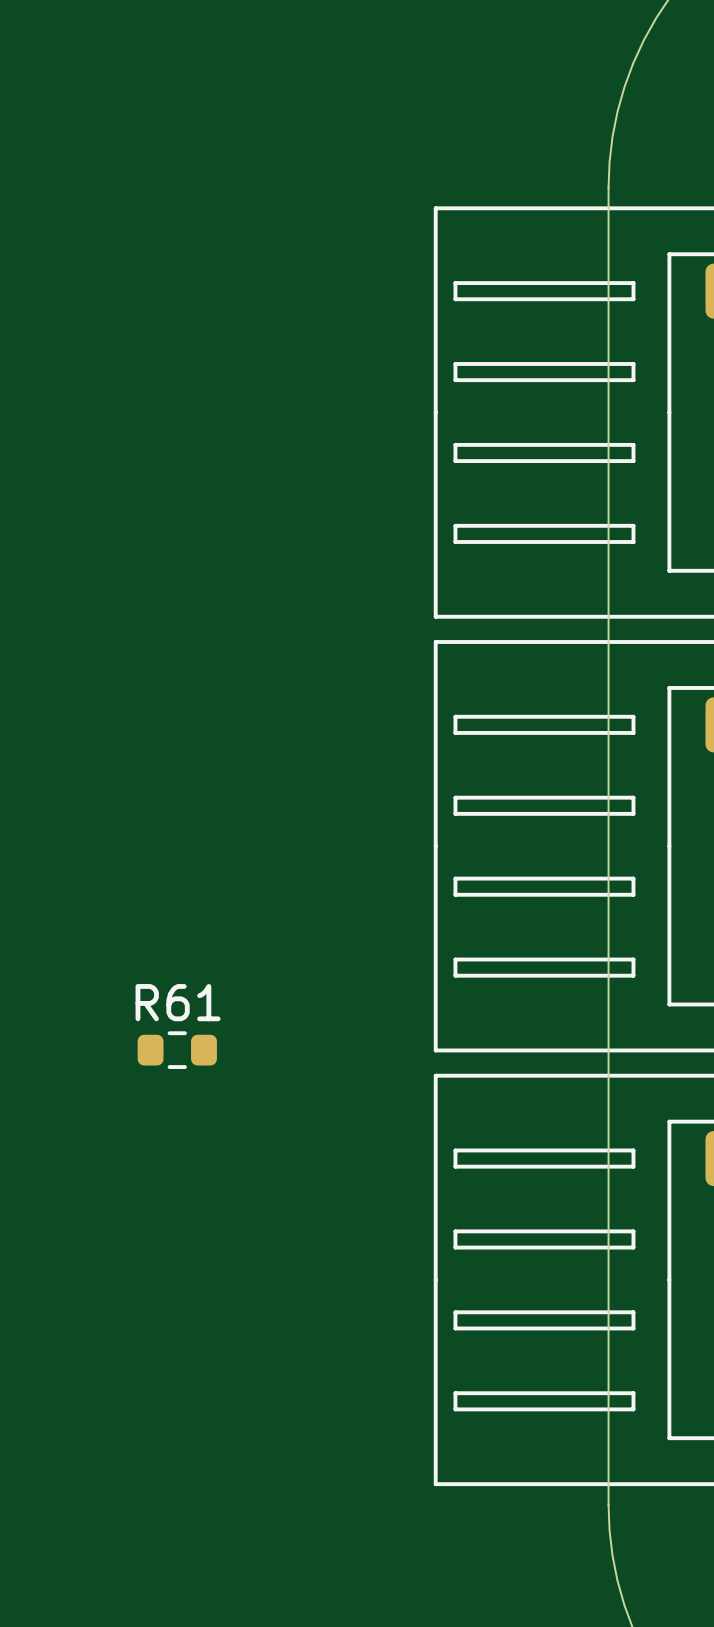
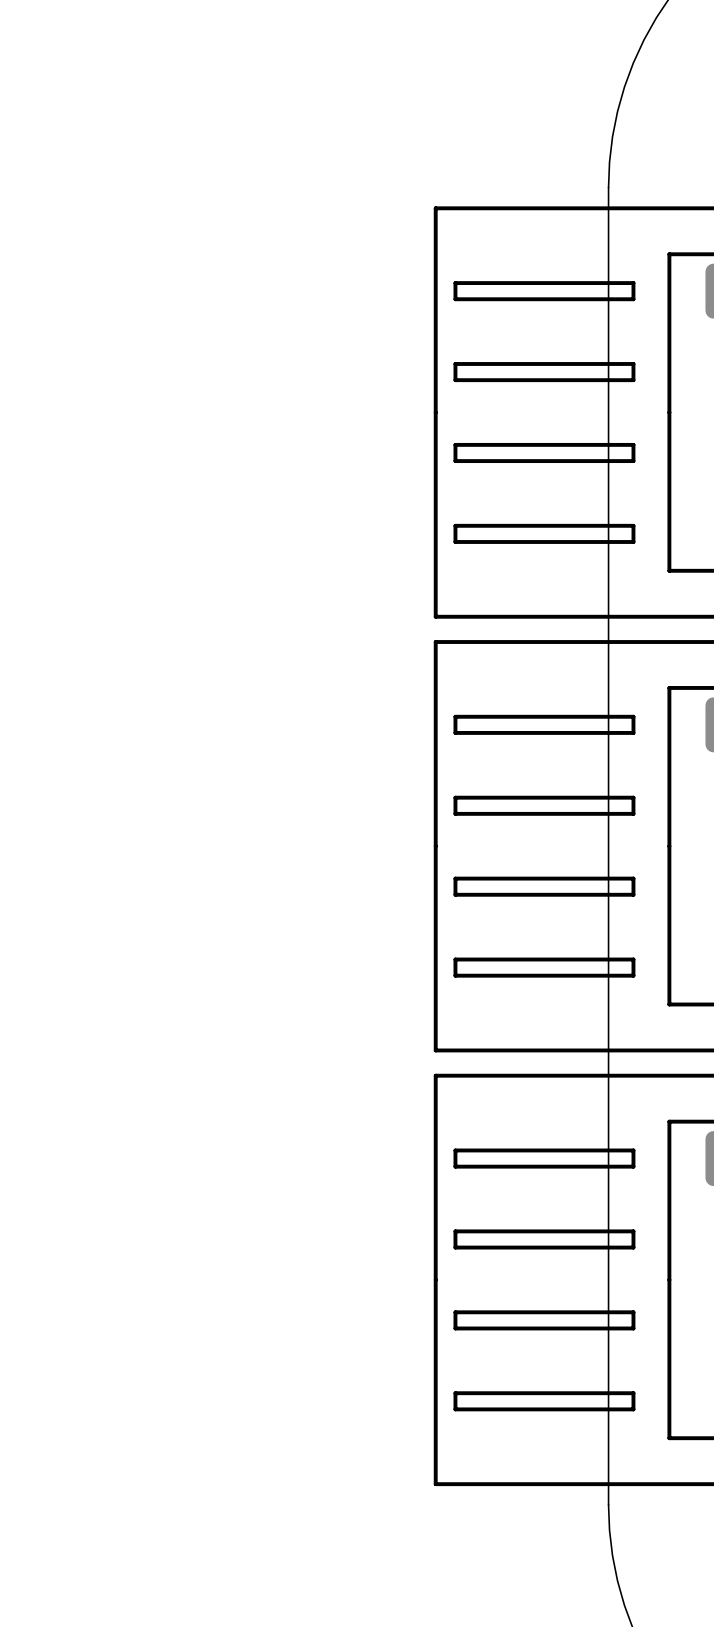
R61: (177, 1050) -> none

